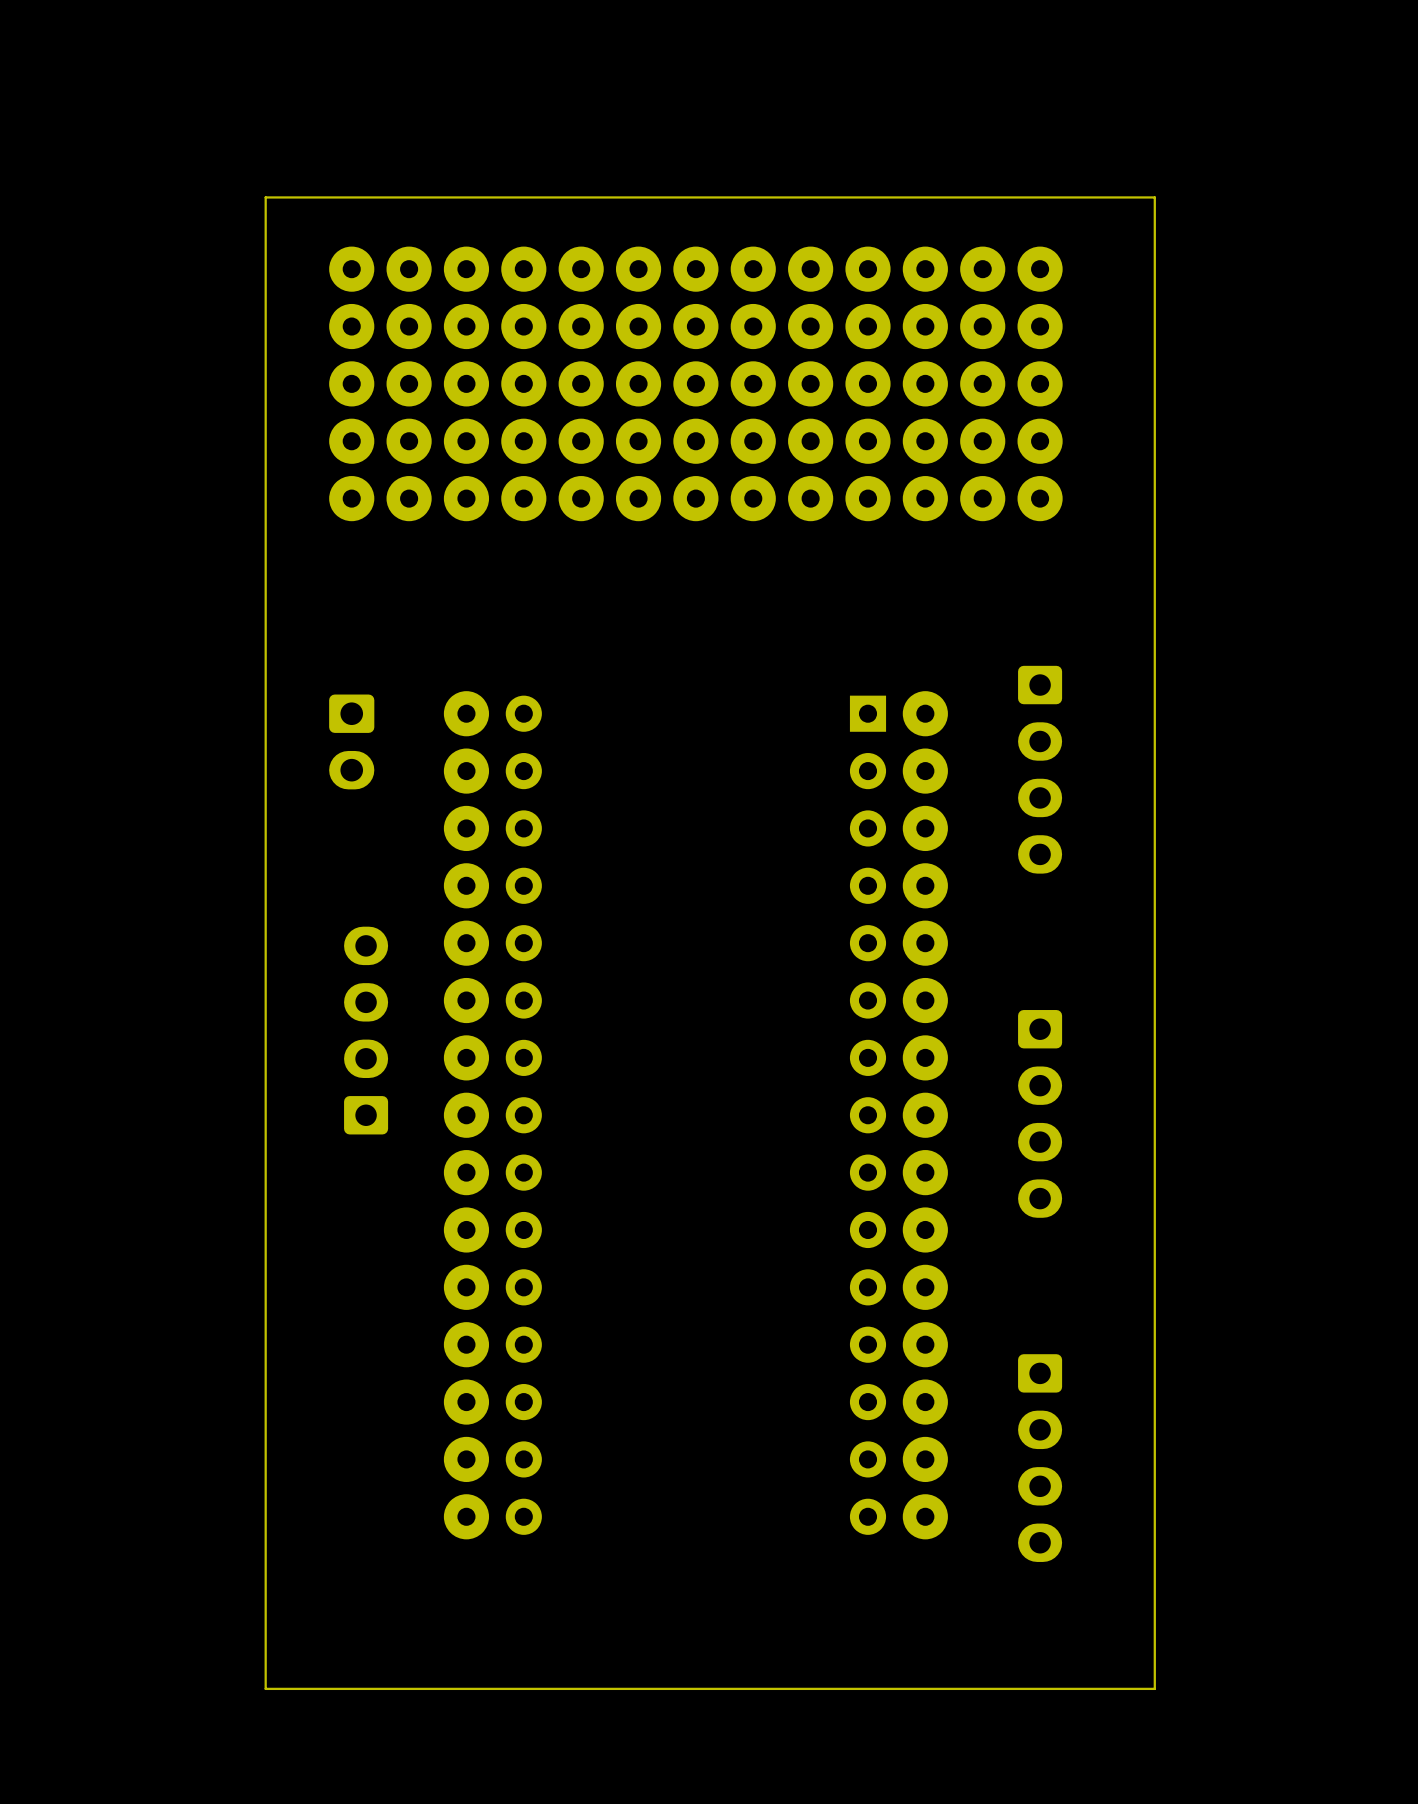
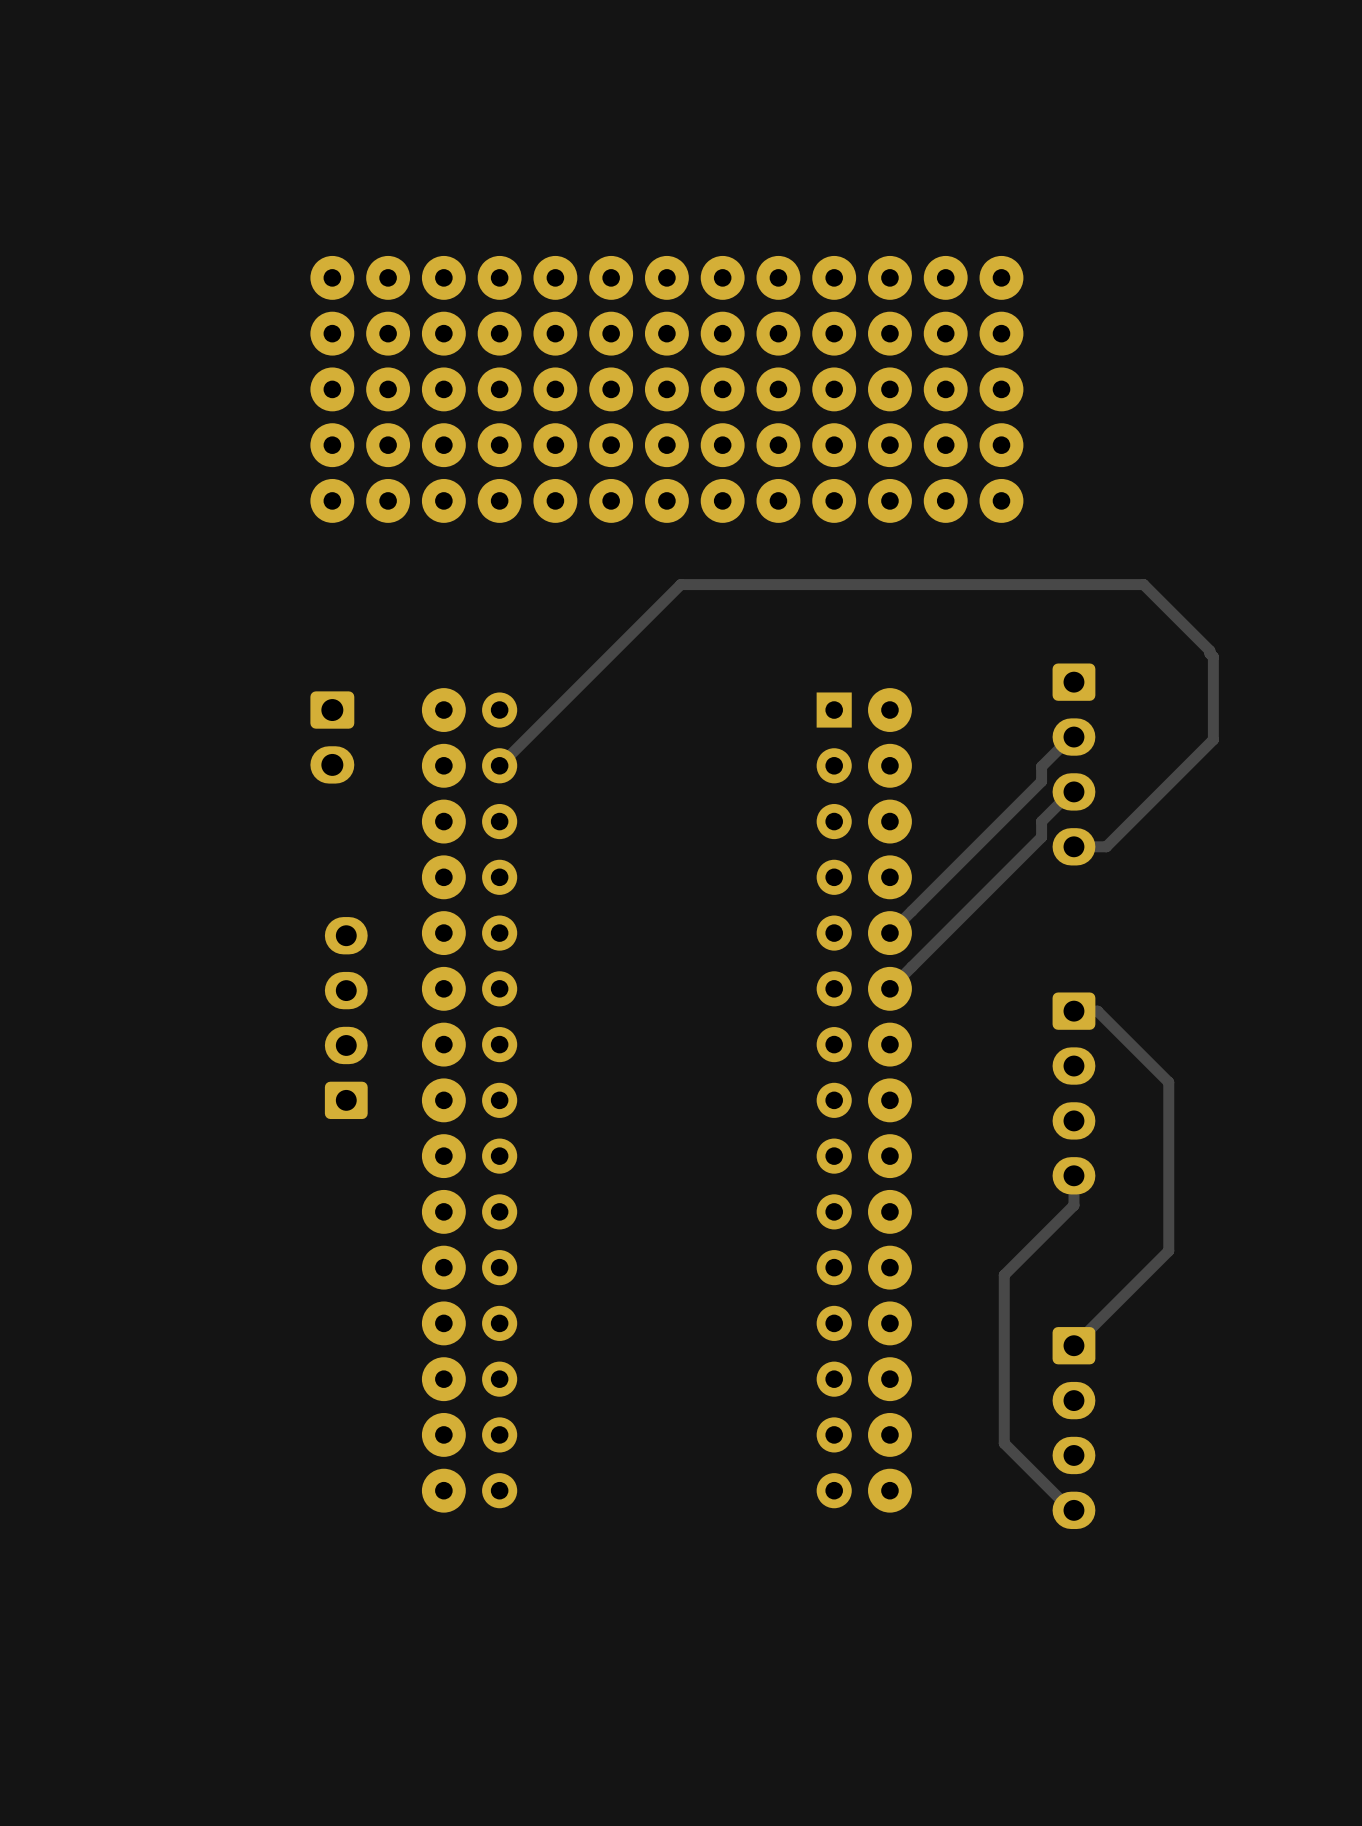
board edge: (1154, 197) (265, 197) (265, 1688) (1154, 1688) (1154, 197) -> none
track: none -> (1073, 737) (1071, 737) (1041, 766) (1041, 781) (889, 933)
part position: (1040, 769) -> (1073, 764)
track: none -> (499, 765) (680, 584) (1143, 584) (1209, 650) (1213, 657) (1213, 739) (1106, 846) (1073, 846)
track: none -> (1073, 791) (1071, 791) (1041, 821) (1041, 837) (889, 988)
track: none -> (1073, 1011) (1097, 1011) (1168, 1082) (1168, 1250) (1073, 1345)
part position: (1040, 1113) -> (1073, 1093)
track: none -> (1073, 1175) (1073, 1205) (1004, 1275) (1004, 1443) (1071, 1510) (1073, 1510)
part position: (1040, 1458) -> (1073, 1428)

